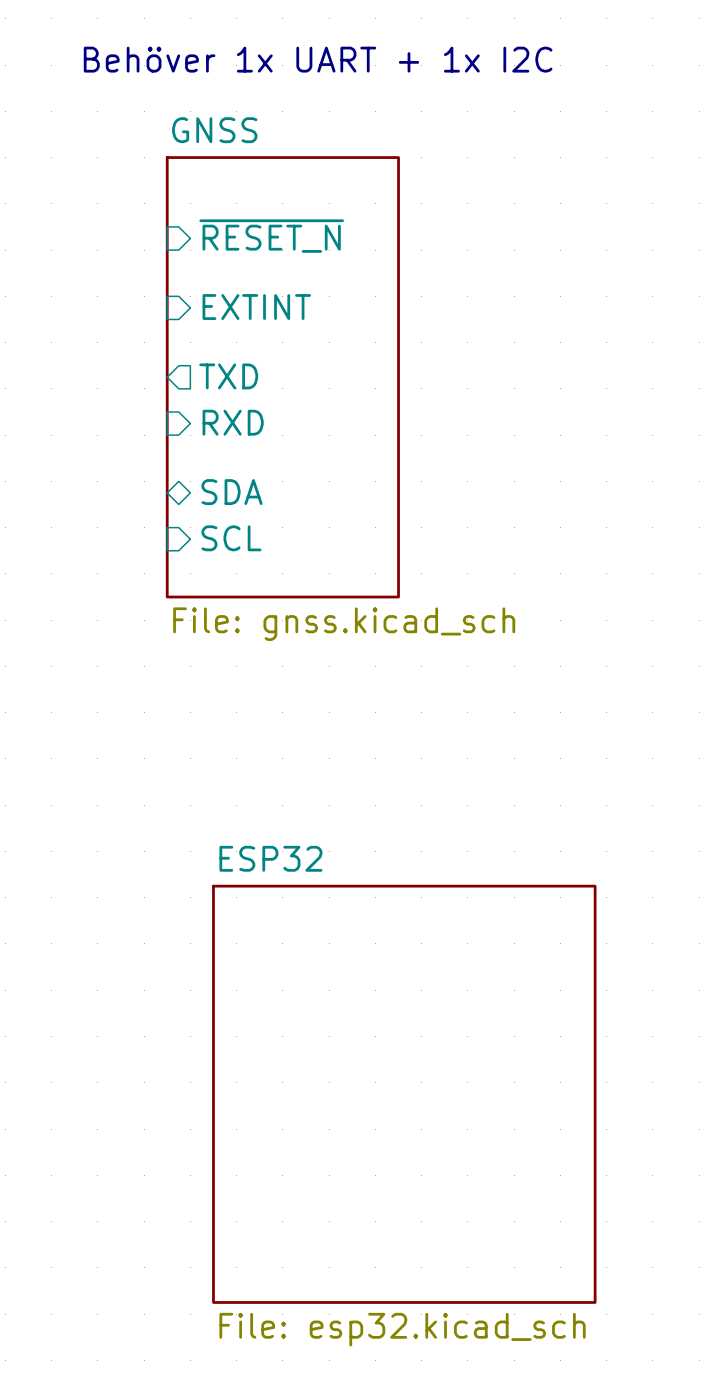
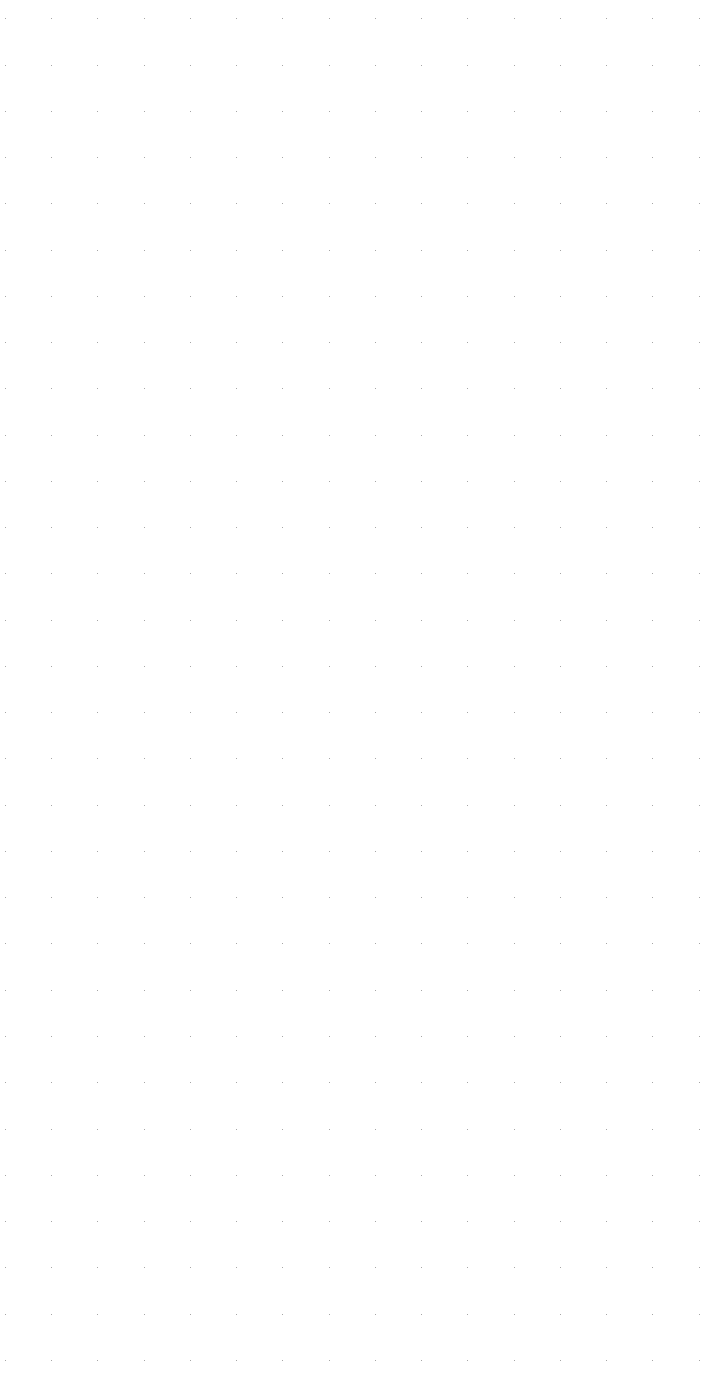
text: Behöver 1x UART + 1x I2C (318, 59) -> none
sheet pin: ~{RESET_N} (271, 236) -> none
sheet pin: EXTINT (256, 307) -> none
sheet pin: TXD (228, 376) -> none
sheet GNSS: File: gnss.kicad_sch (282, 377) -> none
sheet pin: RXD (233, 422) -> none
sheet pin: SDA (232, 492) -> none
sheet pin: SCL (231, 538) -> none
sheet ESP32: File: esp32.kicad_sch (404, 1094) -> none

